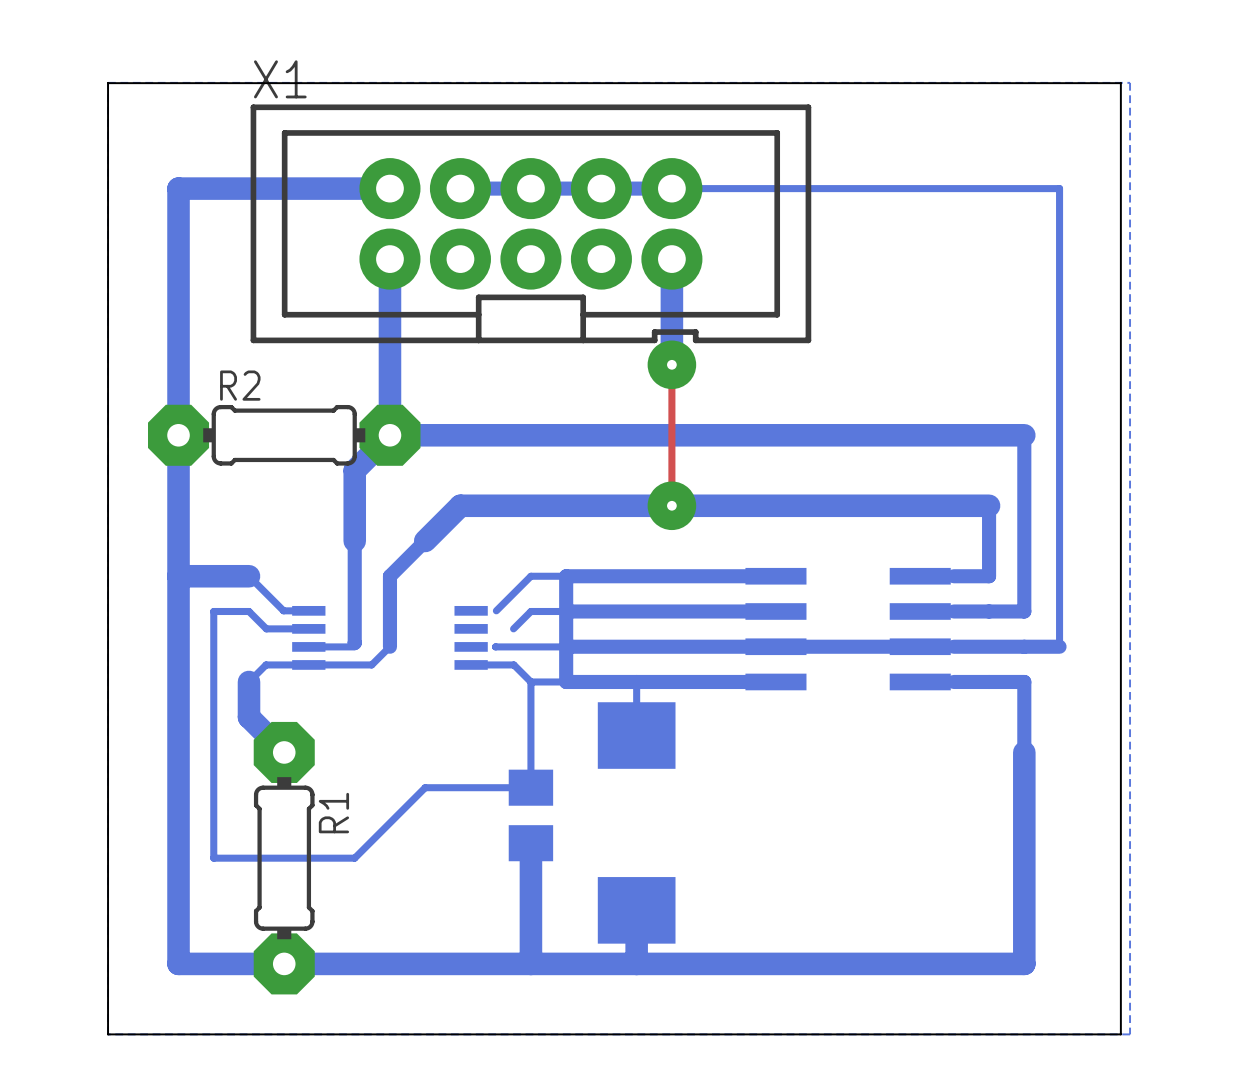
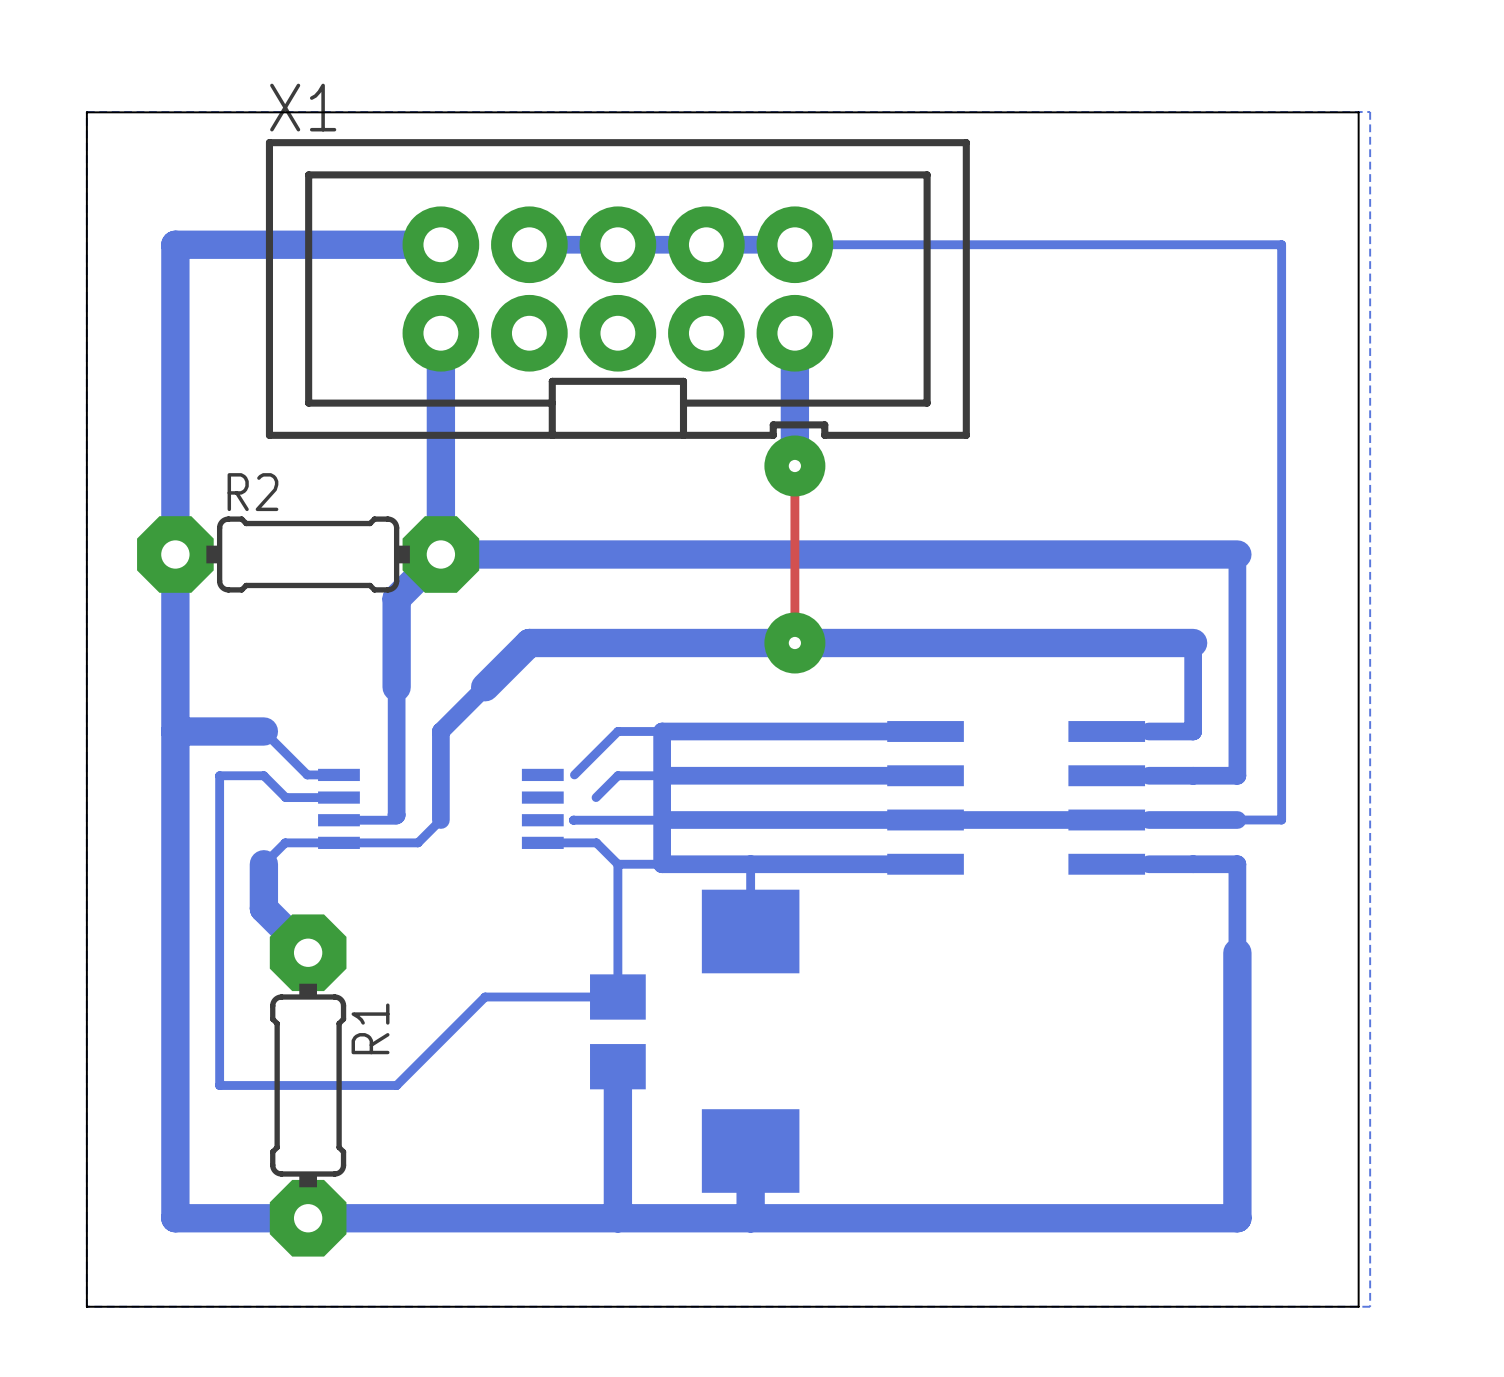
bottom track width: thick (1024, 646) (1059, 646) -> thin (1237, 820) (1281, 820)

